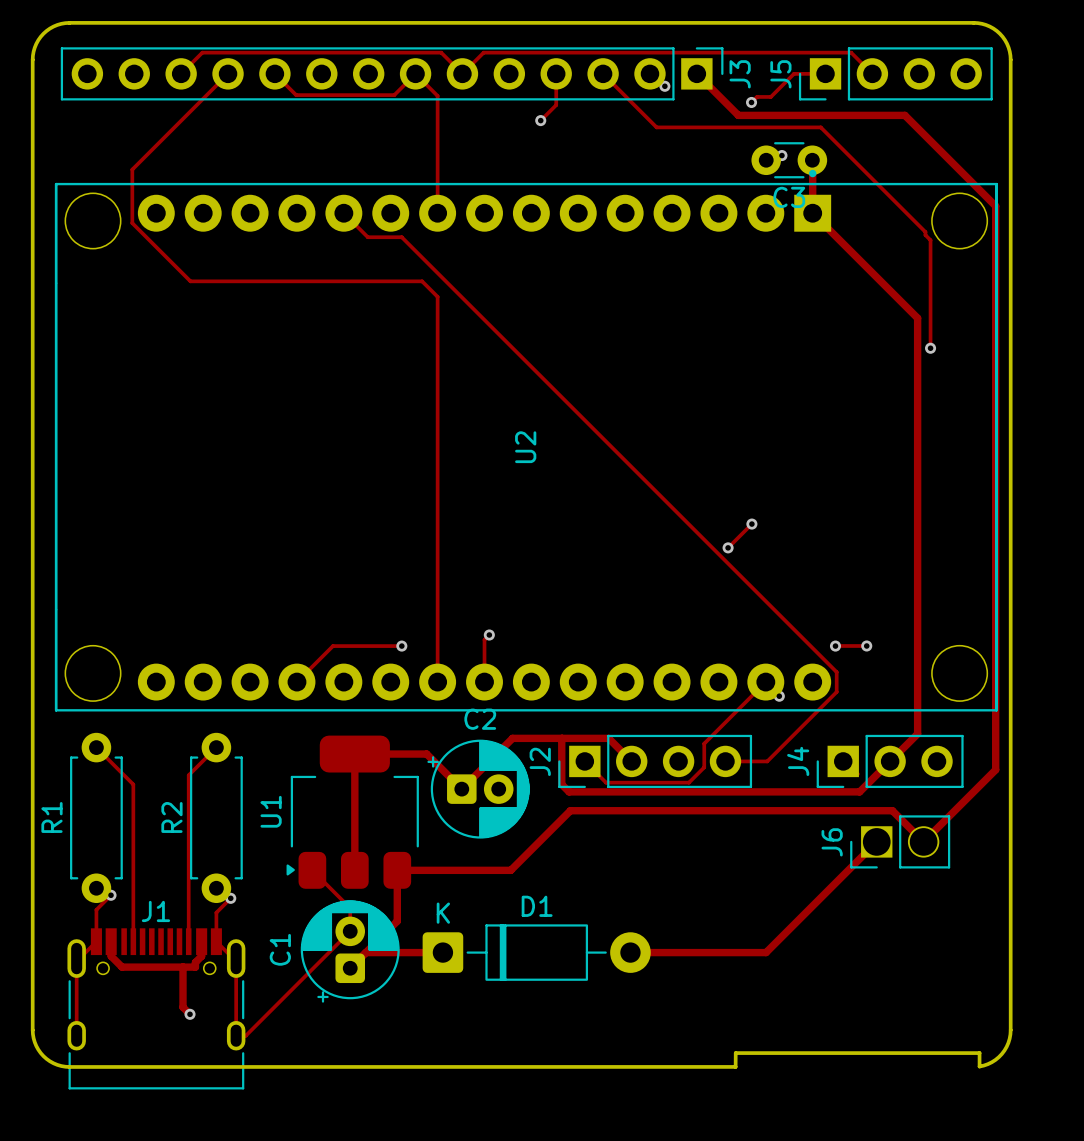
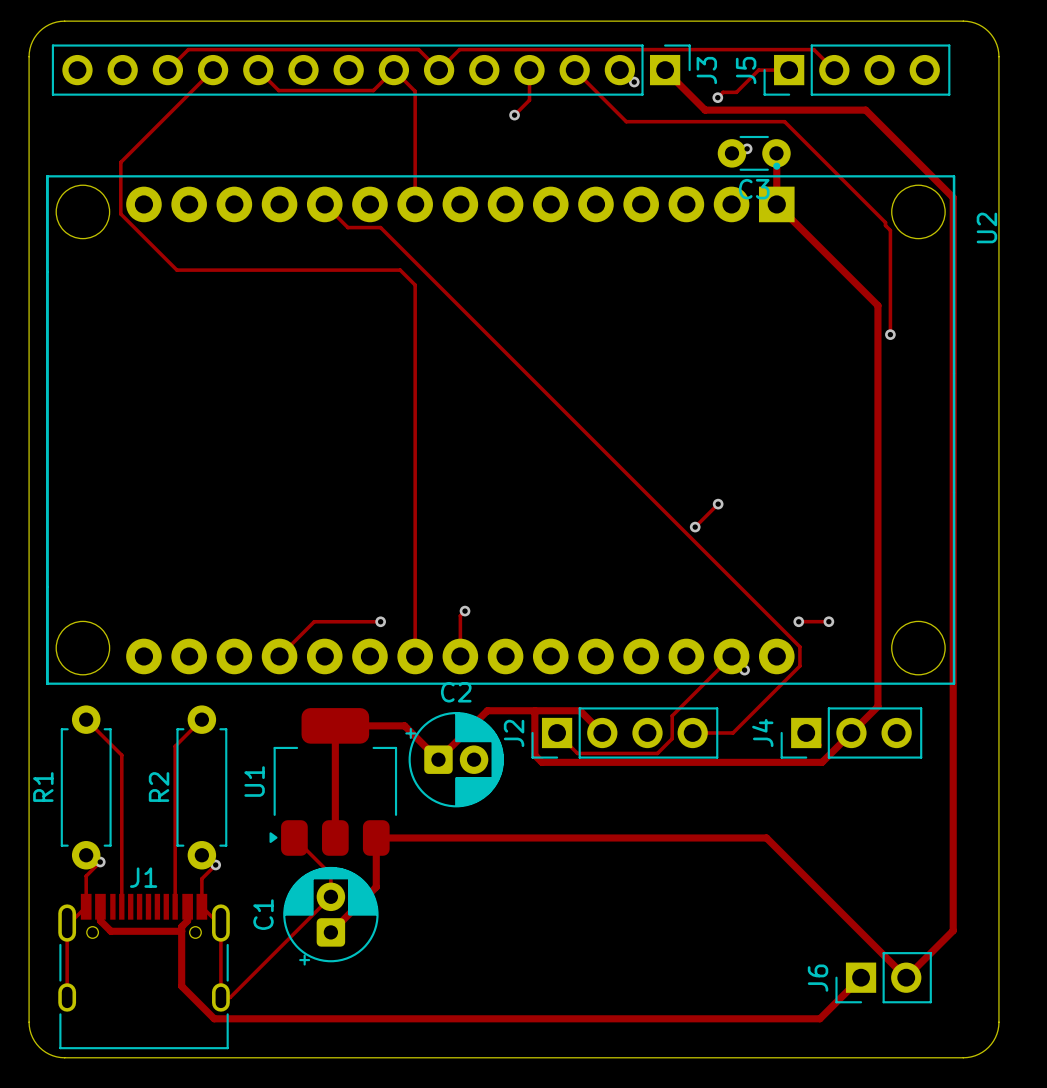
board edge: (69, 22) (973, 22) (989, 26) (999, 33) (1007, 43) (1010, 59) (1010, 1030) (1006, 1046) (998, 1057) (991, 1062) (979, 1066) (979, 1053) (735, 1053) (735, 1066) (69, 1066) (53, 1063) (43, 1056) (34, 1042) (32, 1030) (32, 59) (36, 43) (43, 33) (57, 24) (69, 22) -> (64, 21) (49, 24) (39, 31) (32, 41) (29, 56) (29, 1022) (31, 1033) (39, 1047) (52, 1055) (64, 1057) (963, 1057) (975, 1055) (988, 1047) (995, 1037) (998, 1022) (998, 56) (995, 41) (988, 31) (975, 23) (963, 21) (64, 21)
U2 name position: U2 (525, 447) -> U2 (986, 227)
track: (995, 769) (923, 841) (892, 810) (570, 810) (510, 870) -> (953, 741) (953, 930) (906, 977) (766, 837) (485, 837)
J6 footprint: [850, 815, 951, 869] -> [835, 952, 932, 1004]
track: (876, 841) (766, 952) (630, 952) -> none
track: (365, 952) (442, 952) -> none
D1: (536, 952) -> none
track: (182, 967) (182, 1007) (190, 1014) -> none
track: none -> (181, 931) (181, 986) (214, 1018) (819, 1018) (861, 977)
via: (190, 1014) -> none

